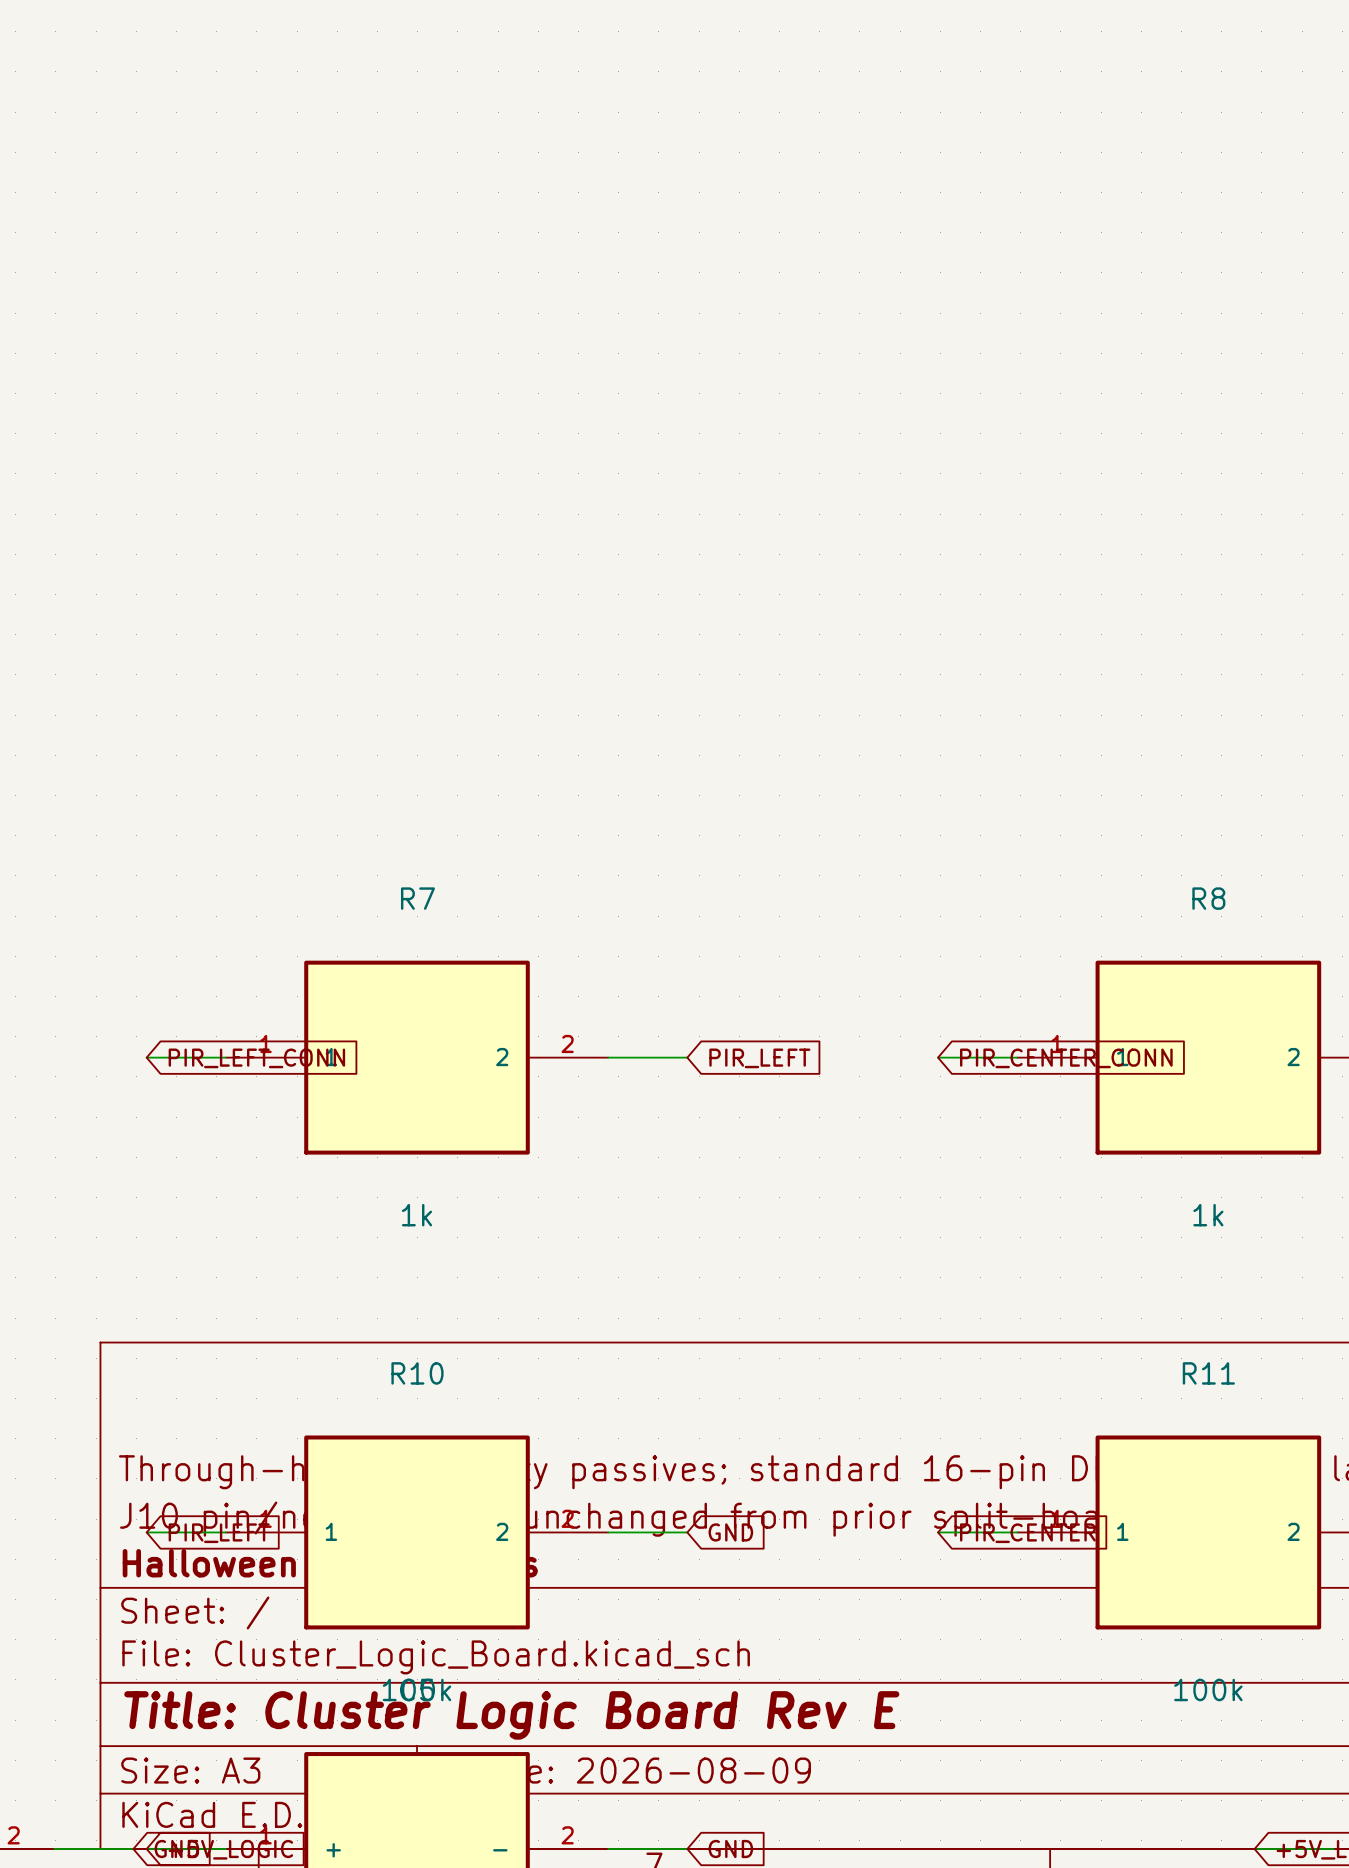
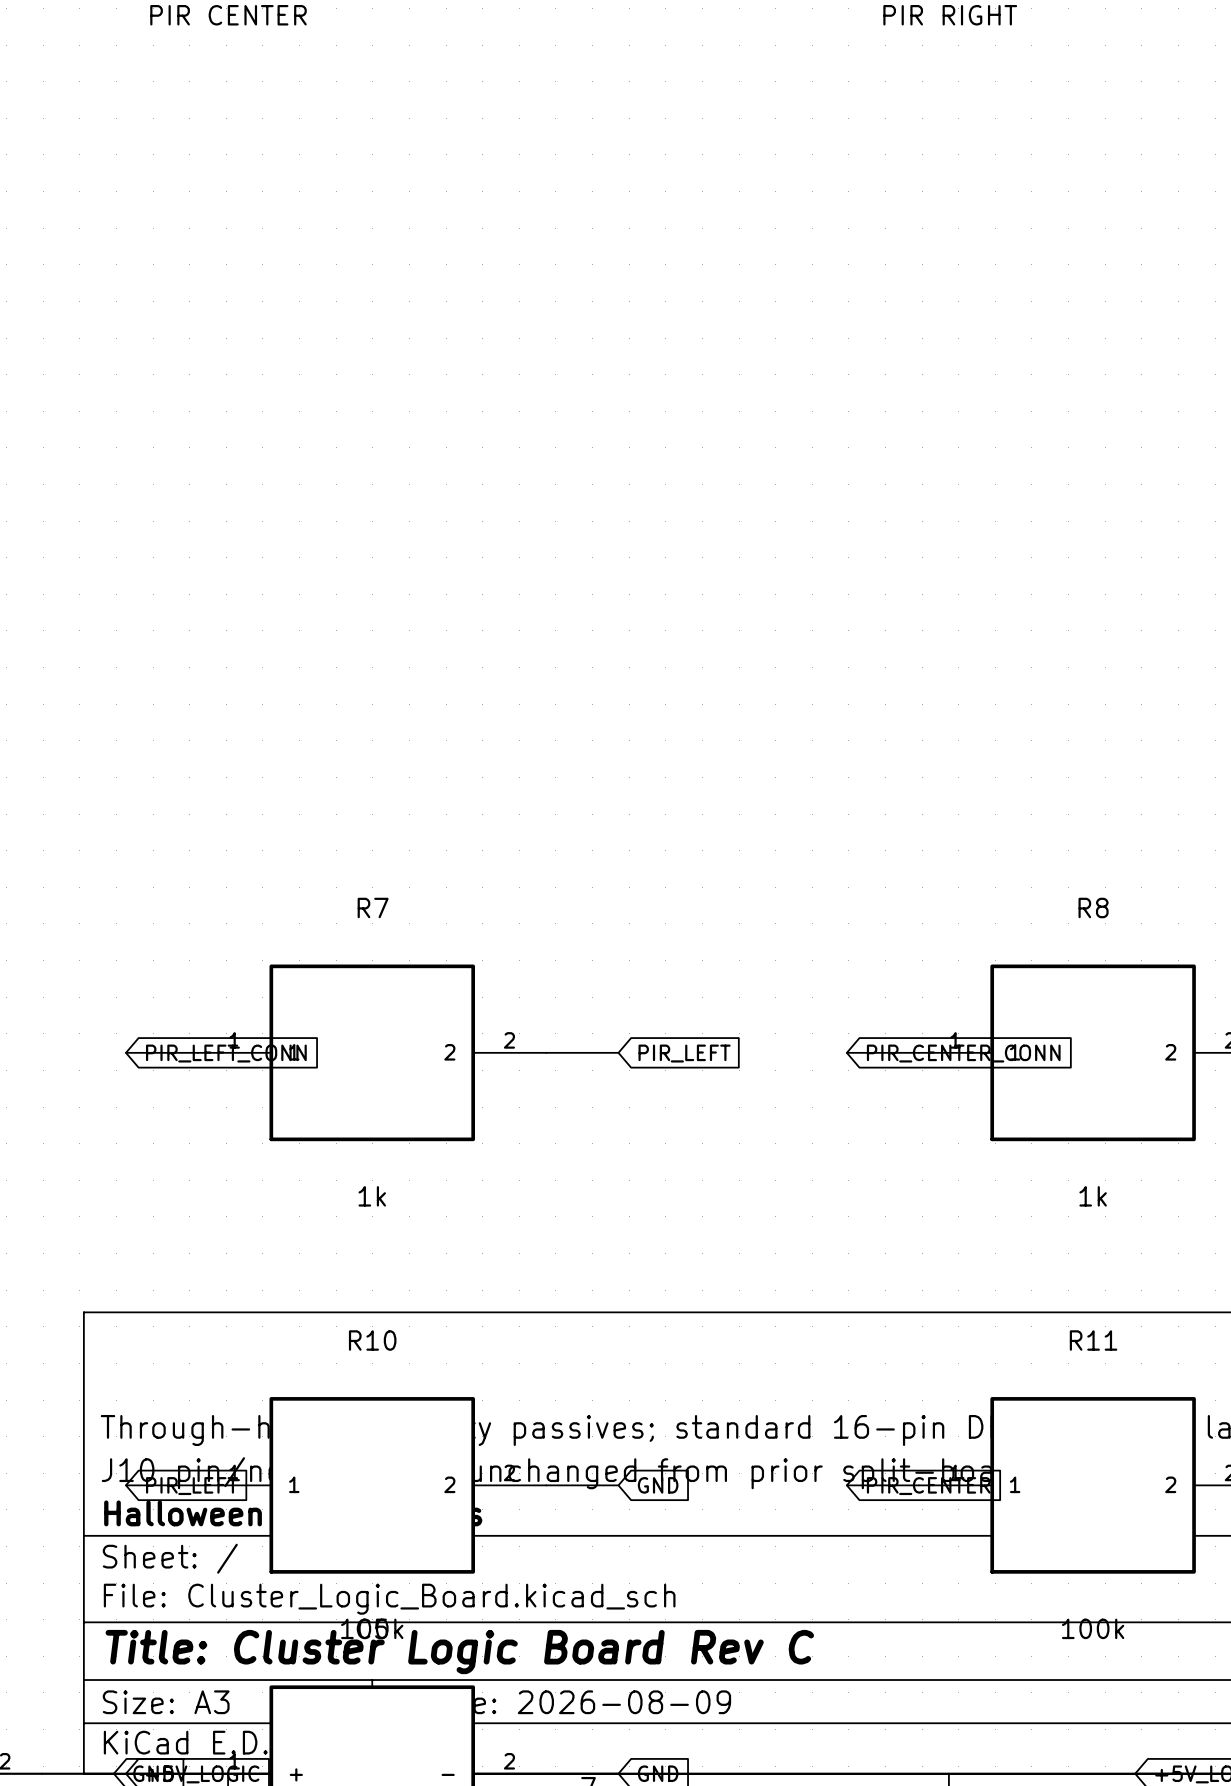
title block: Title: Cluster Logic Board Rev E (511, 1715) -> Title: Cluster Logic Board Rev C (459, 1652)

